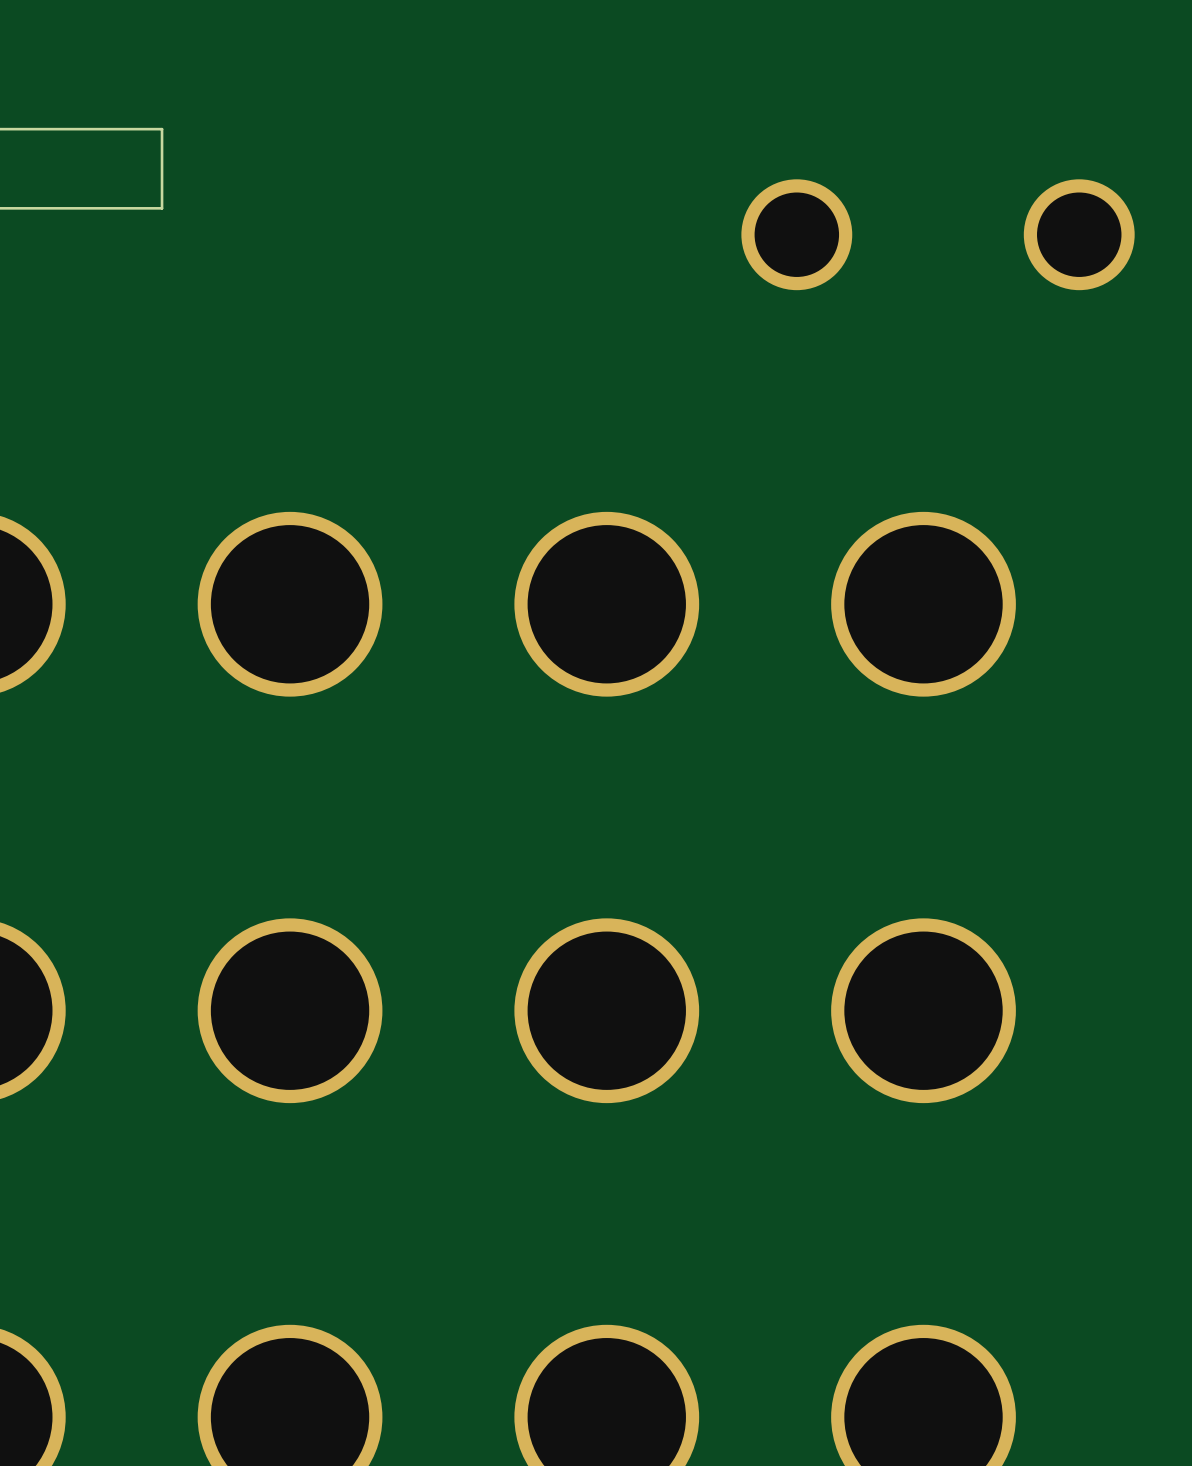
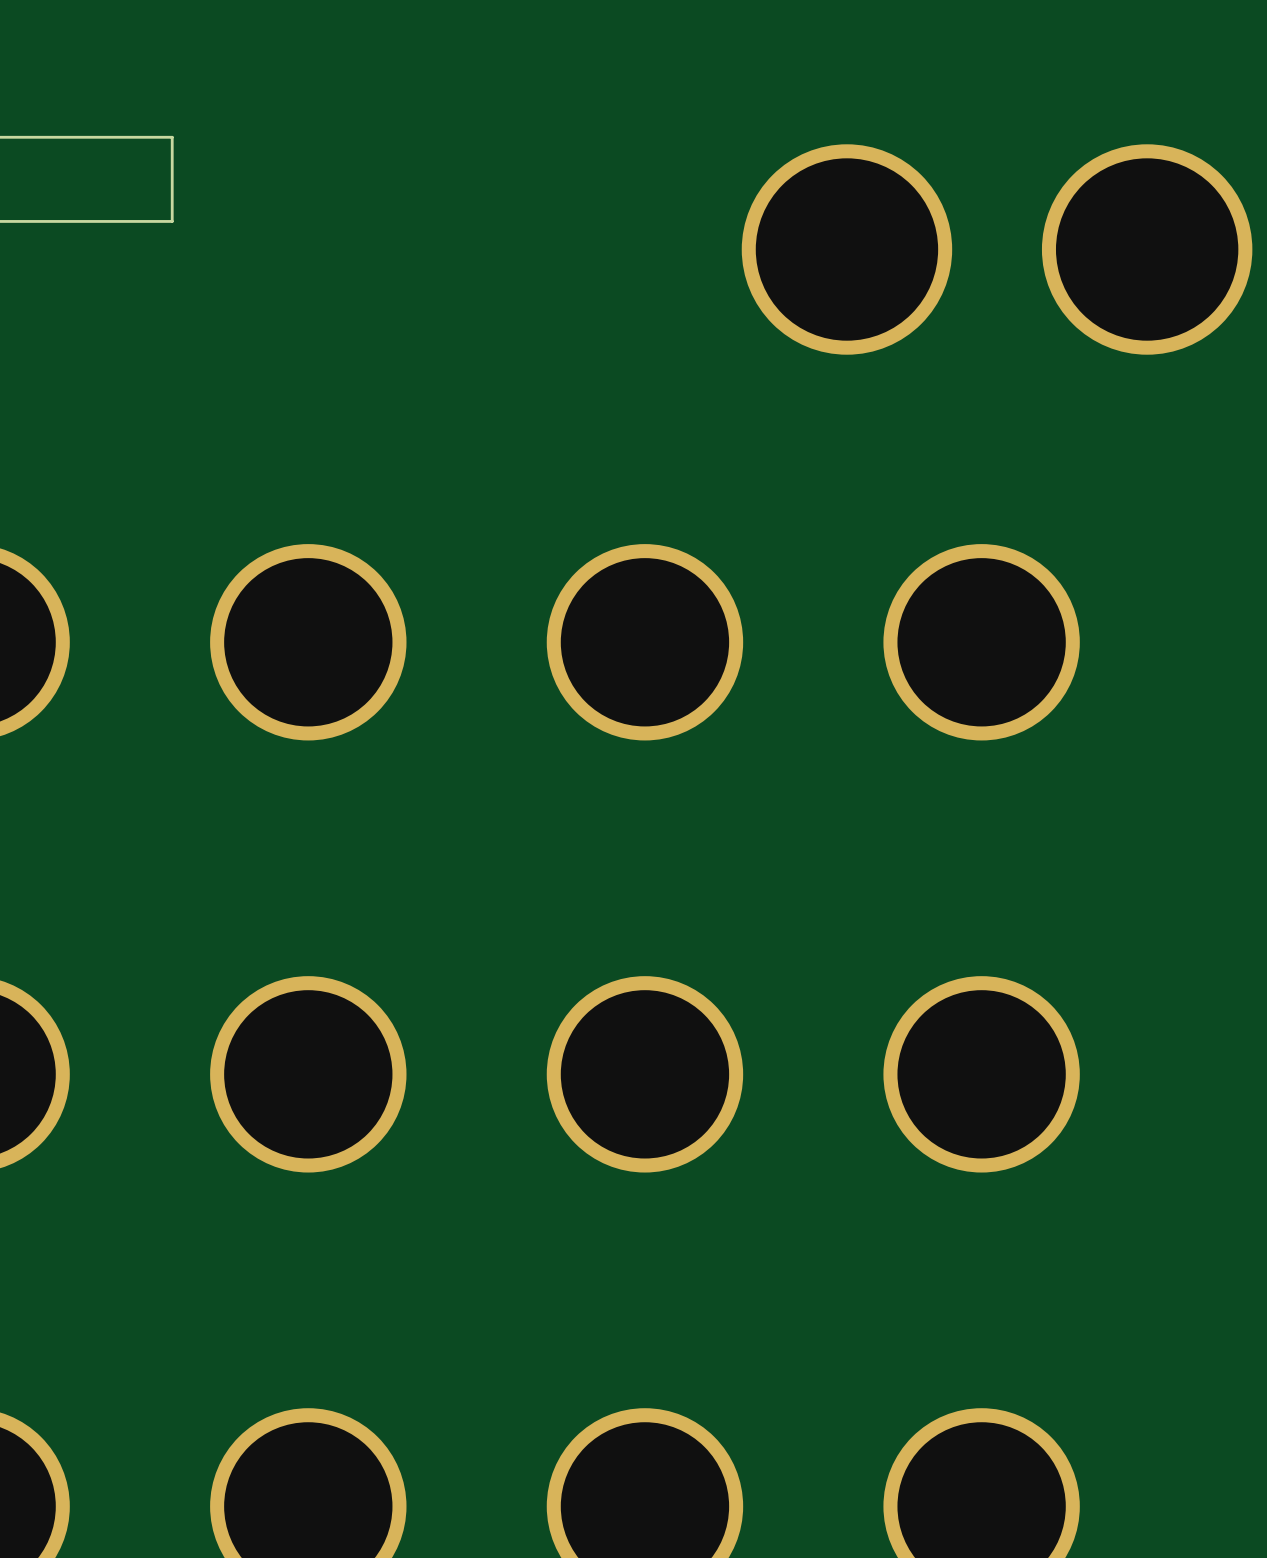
part footprint: [741, 179, 853, 291] -> [741, 144, 953, 355]
part footprint: [1023, 179, 1135, 291] -> [1041, 144, 1253, 355]

